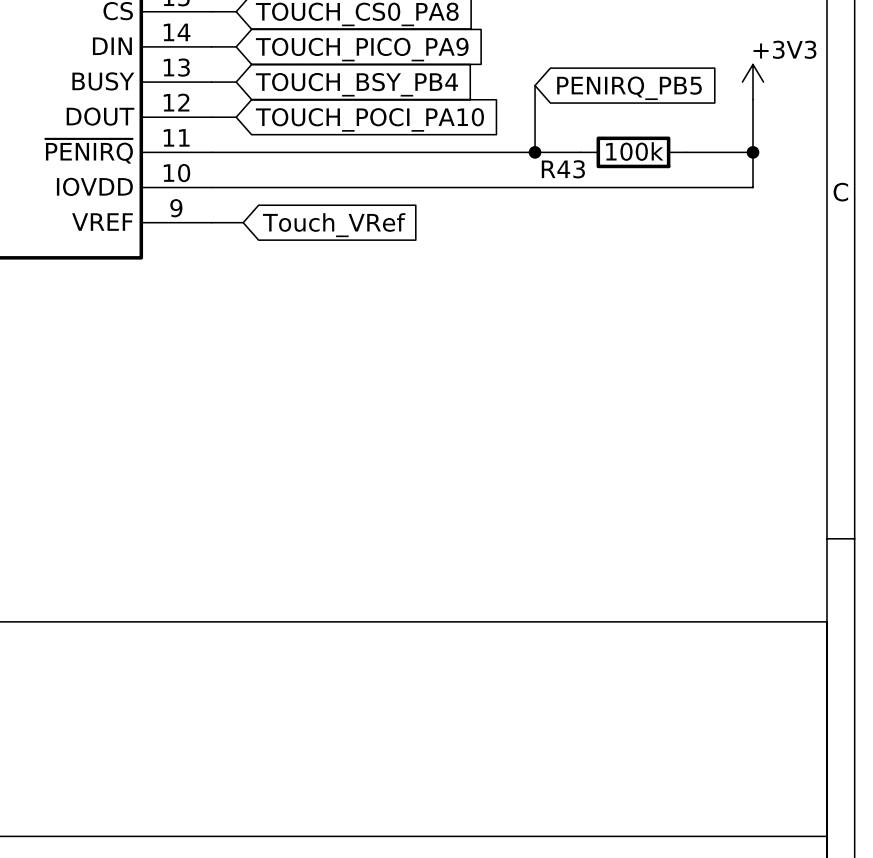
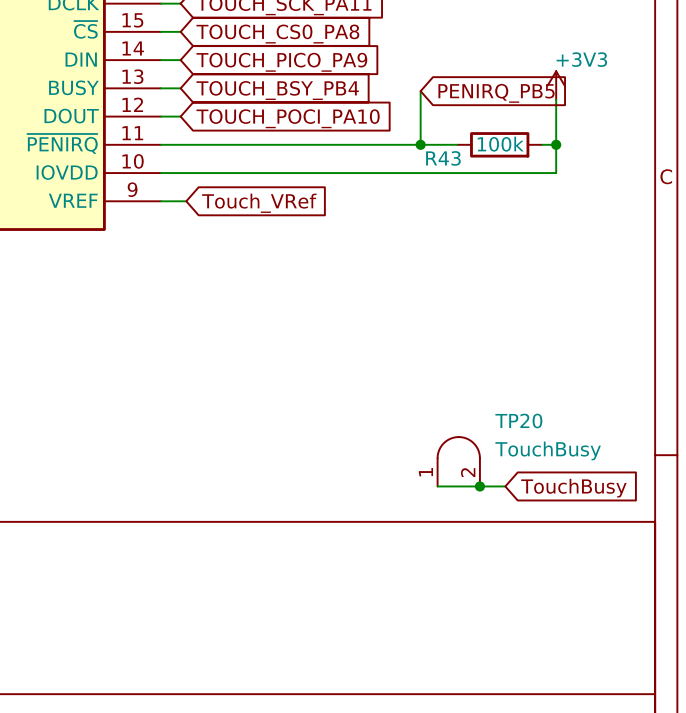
power symbol position: +3V3 (753, 82) -> +3V3 (556, 85)
wire: (753, 99) (753, 187) (703, 187) -> (556, 99) (556, 173)
wire: (703, 152) (753, 152) -> none
junction position: (753, 152) -> (556, 144)
TP20: none -> TouchBusy (458, 461)
wire: none -> (437, 486) (505, 486)
junction: none -> (479, 486)
global label: none -> TouchBusy (573, 488)

